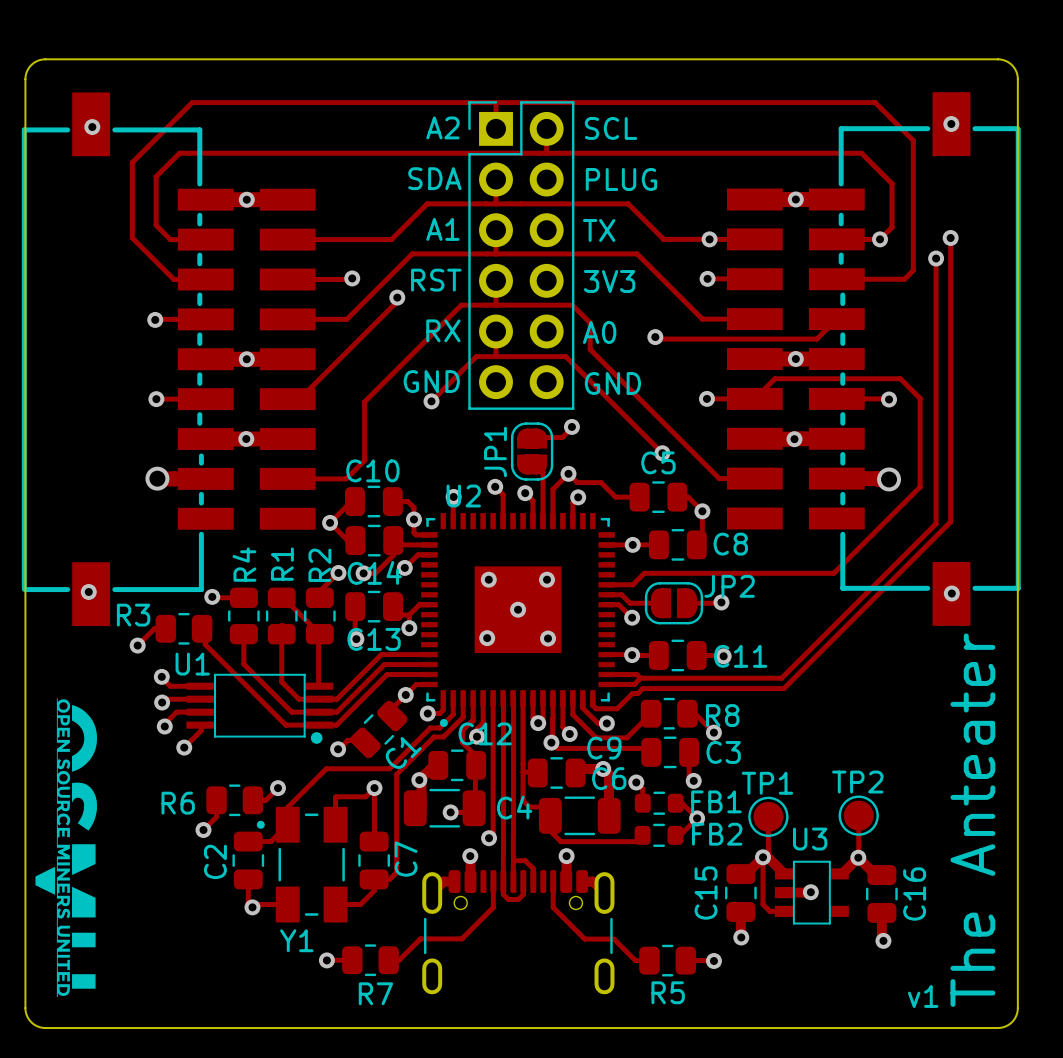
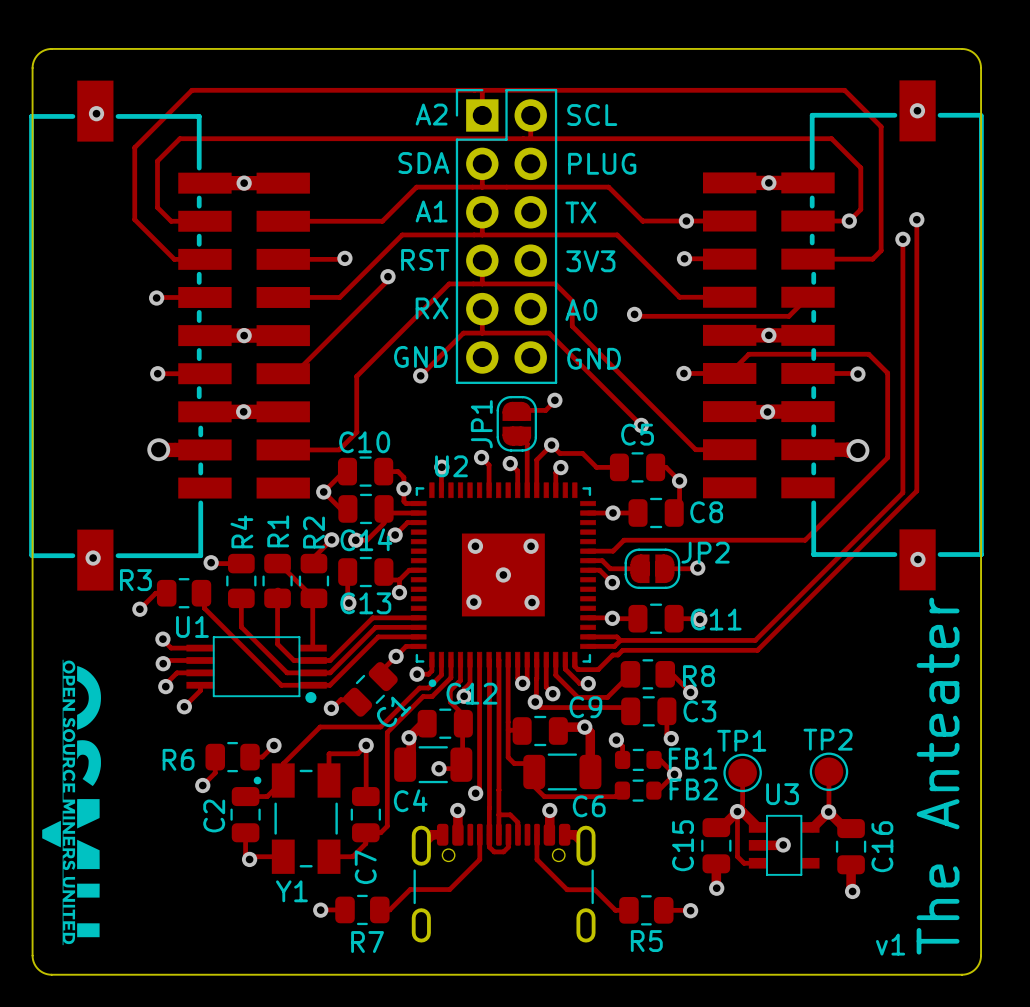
C6 name position: C6 (609, 778) -> C6 (589, 806)
C4 name position: C4 (514, 807) -> C4 (410, 800)
C7 name position: C7 (406, 859) -> C7 (365, 867)

